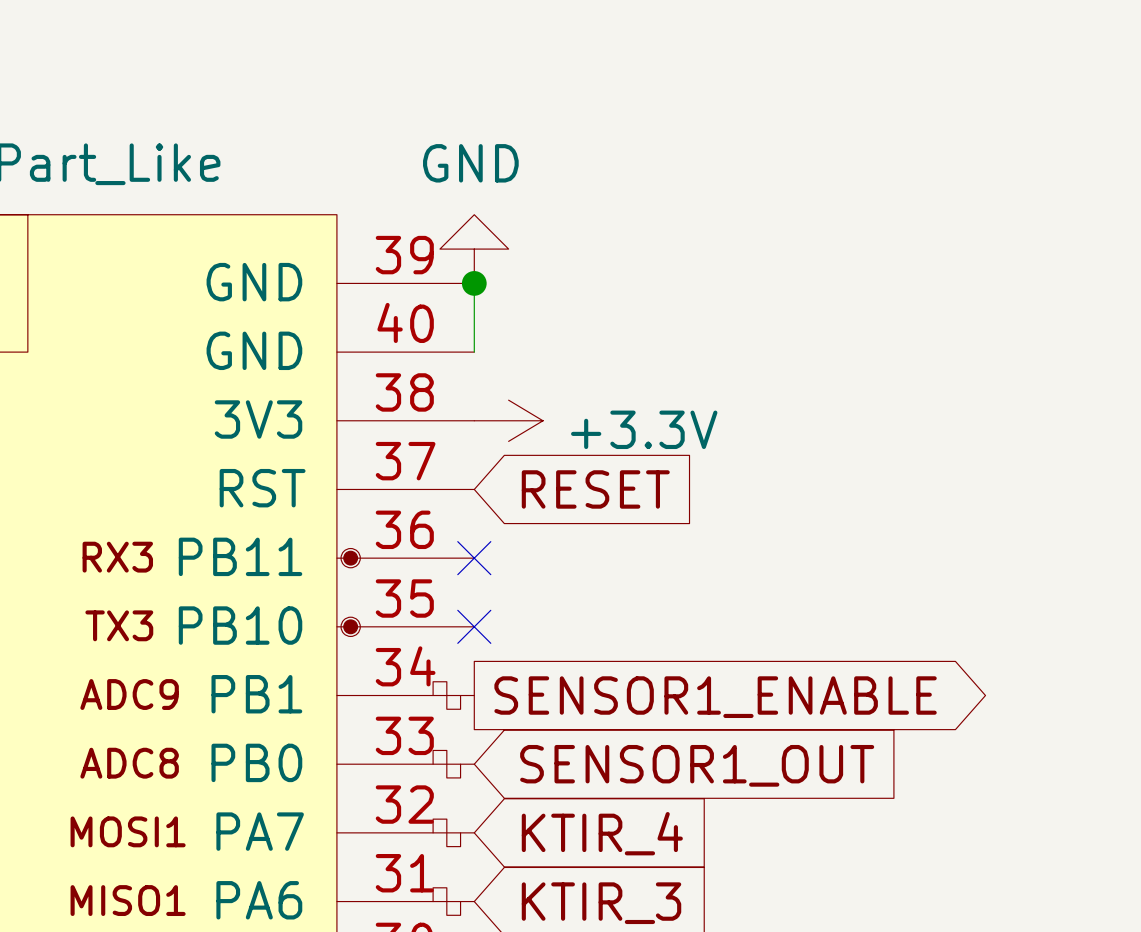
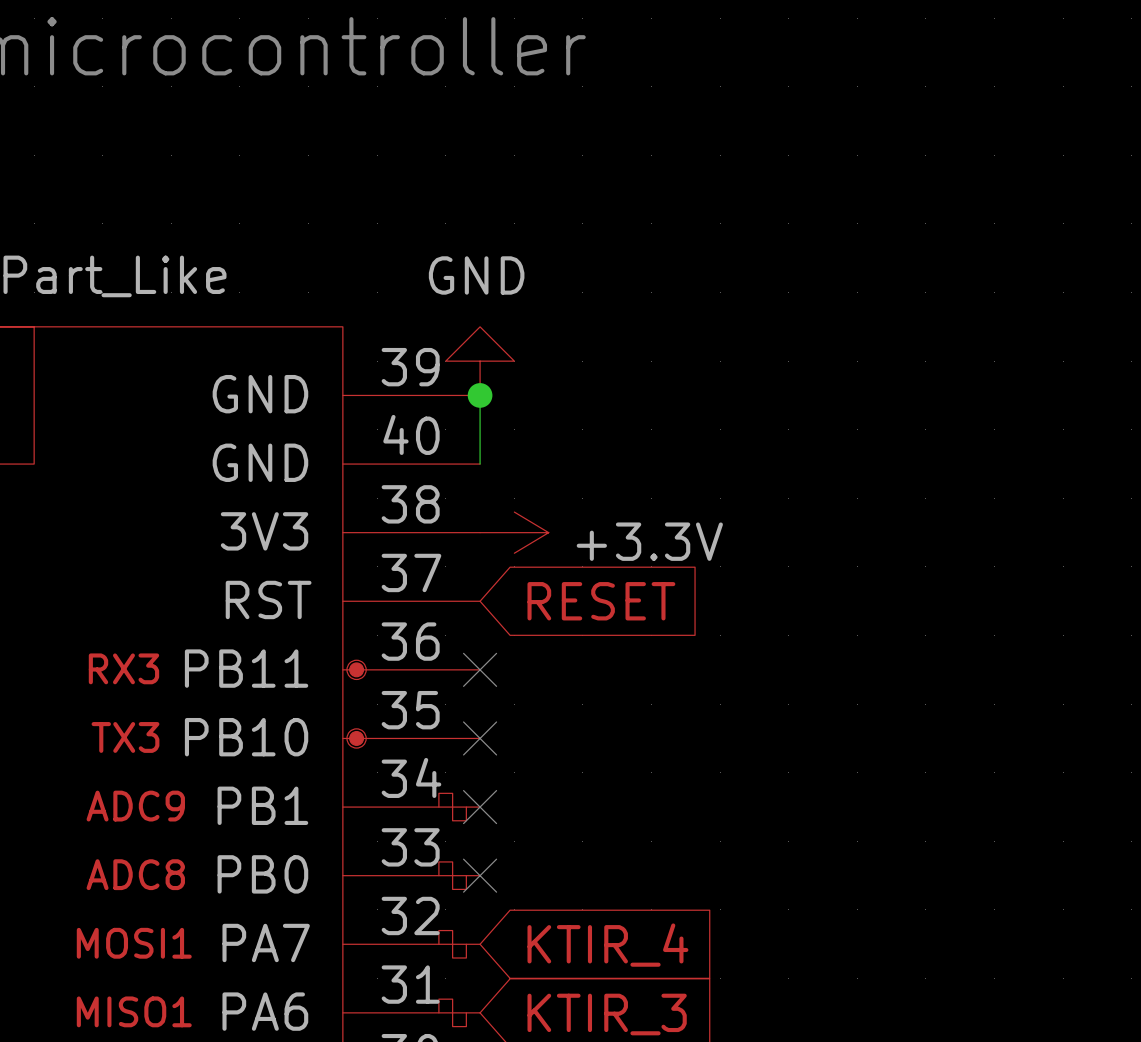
no-connect mark: none -> (480, 807)
global label: SENSOR1_ENABLE (715, 697) -> none
no-connect mark: none -> (480, 875)
global label: SENSOR1_OUT (697, 765) -> none

